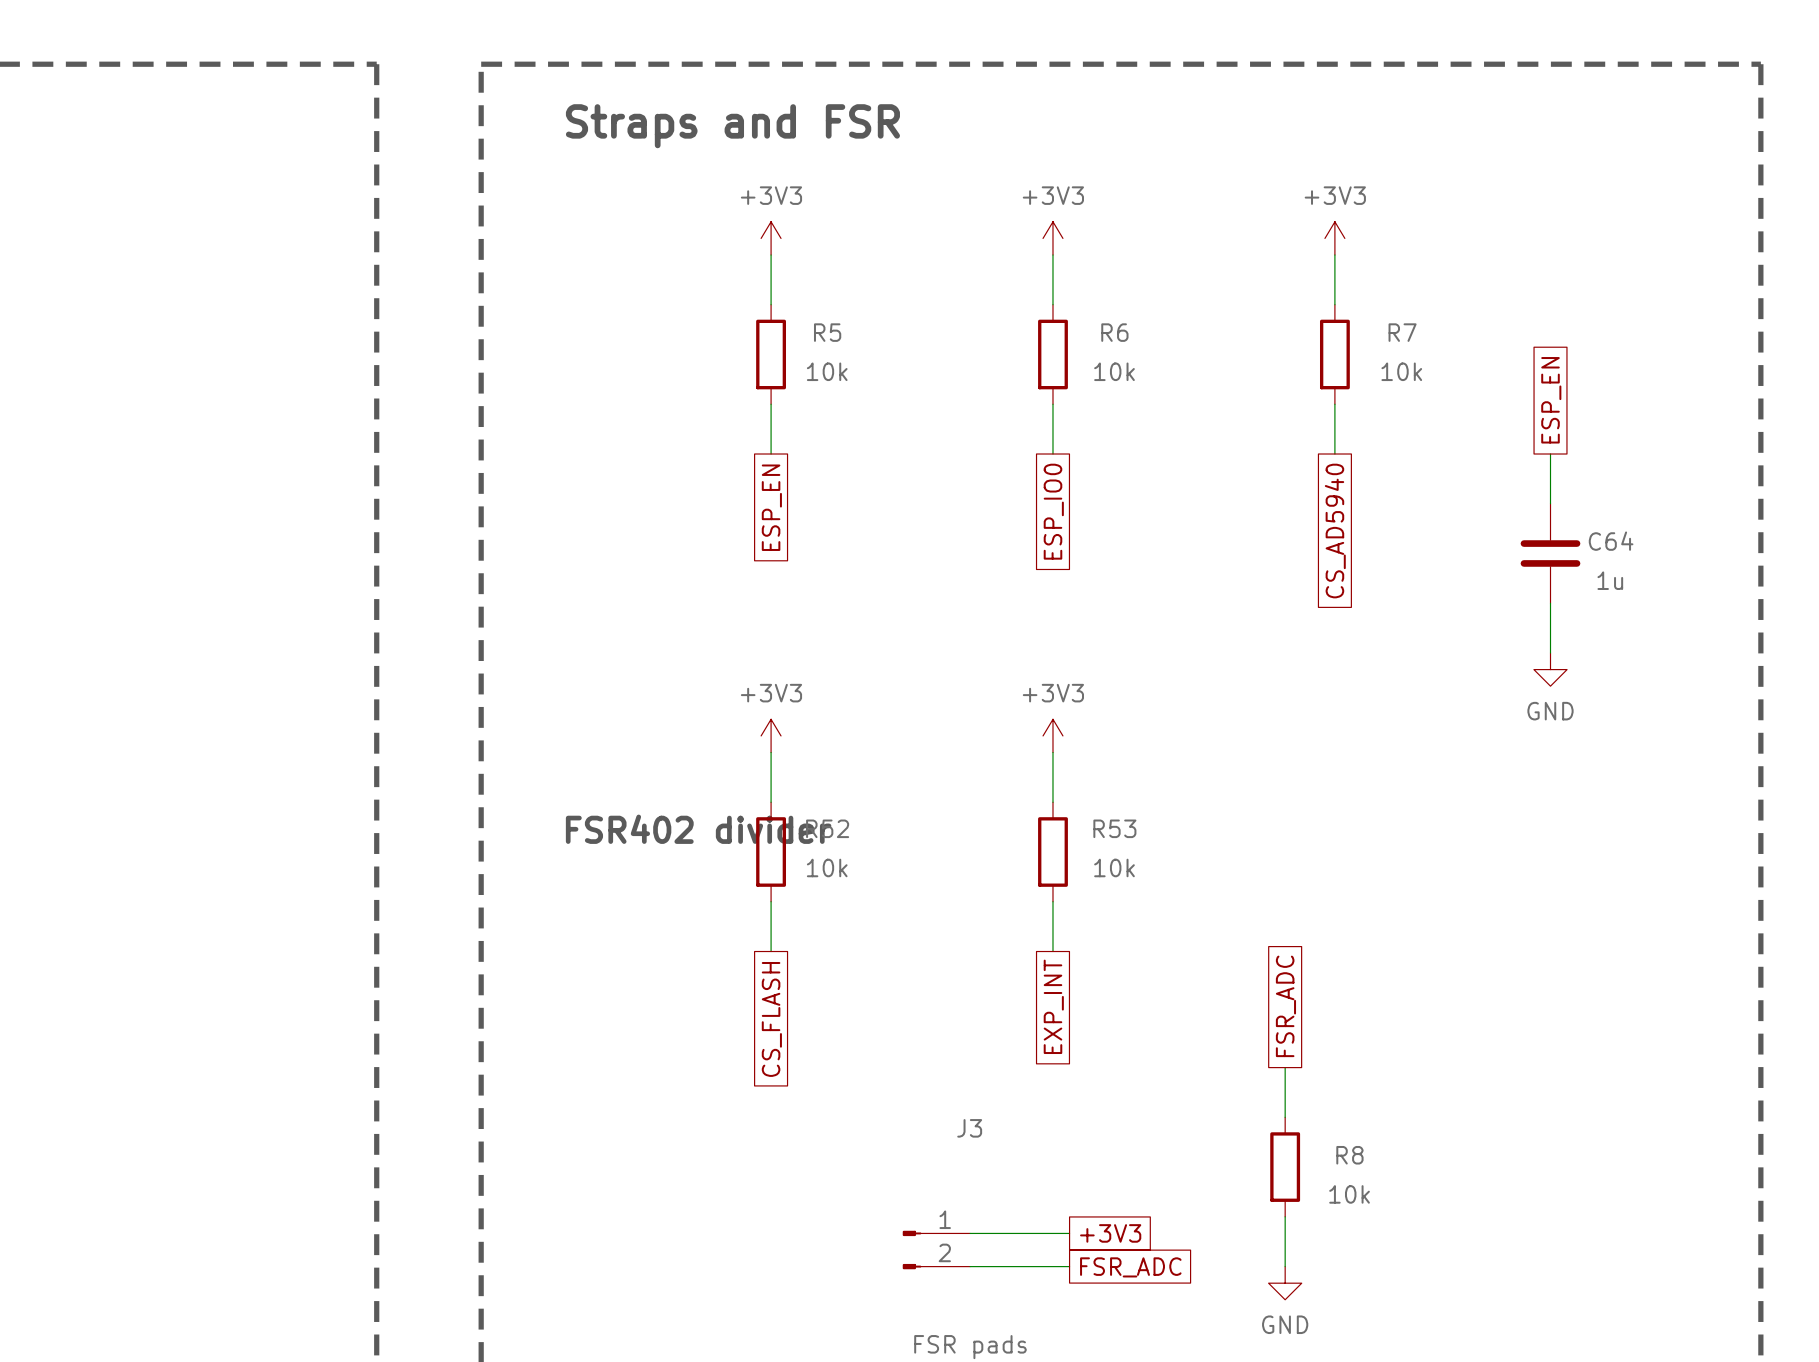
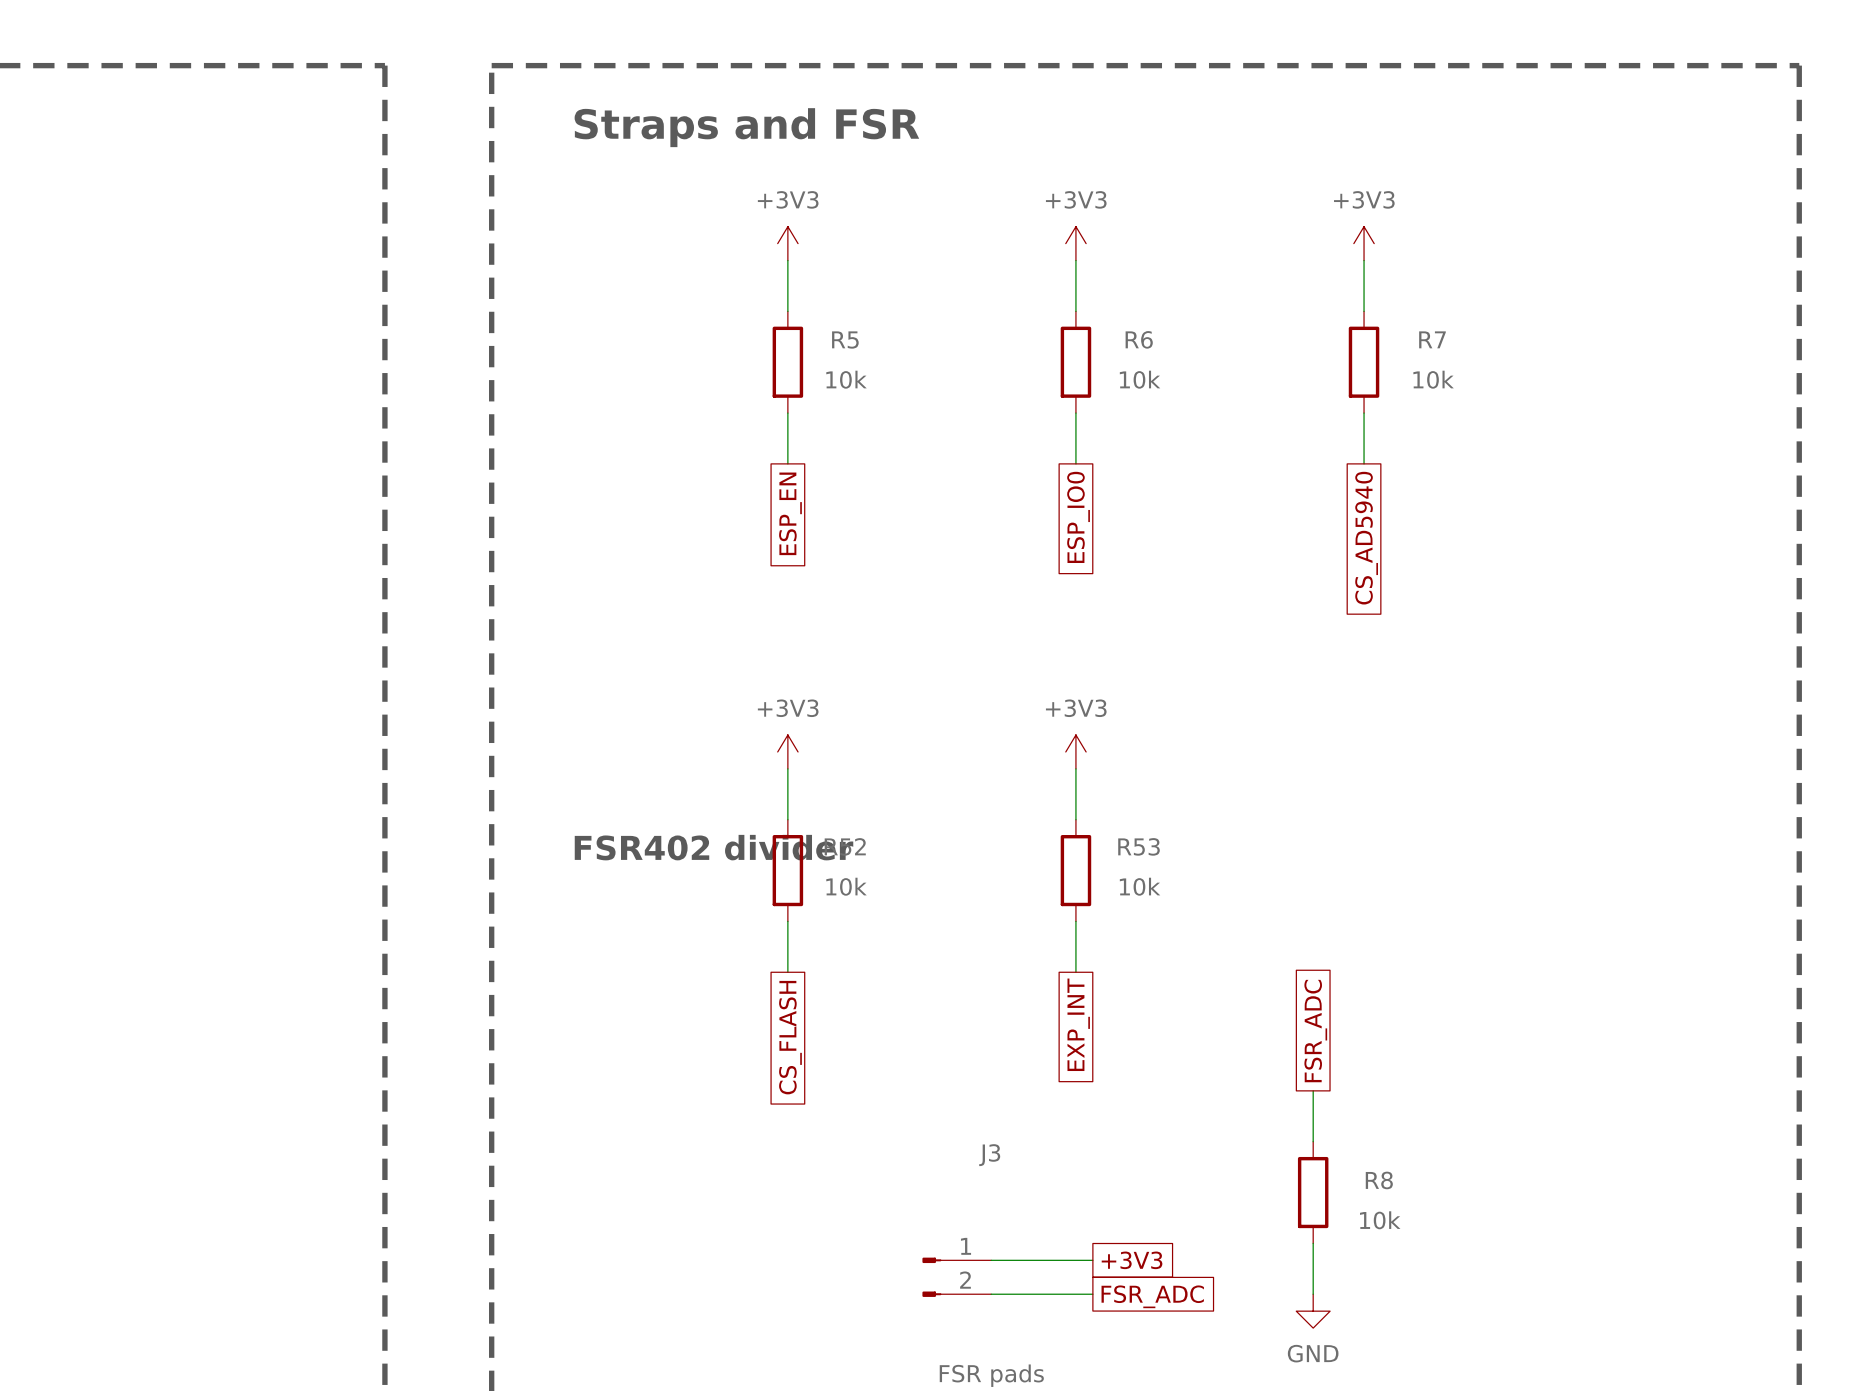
global label: ESP_EN (1551, 400) -> none
wire: (1550, 454) (1550, 503) -> none
C64: 1u (1550, 553) -> none
wire: (1550, 603) (1550, 653) -> none
power symbol: GND (1550, 669) -> none

